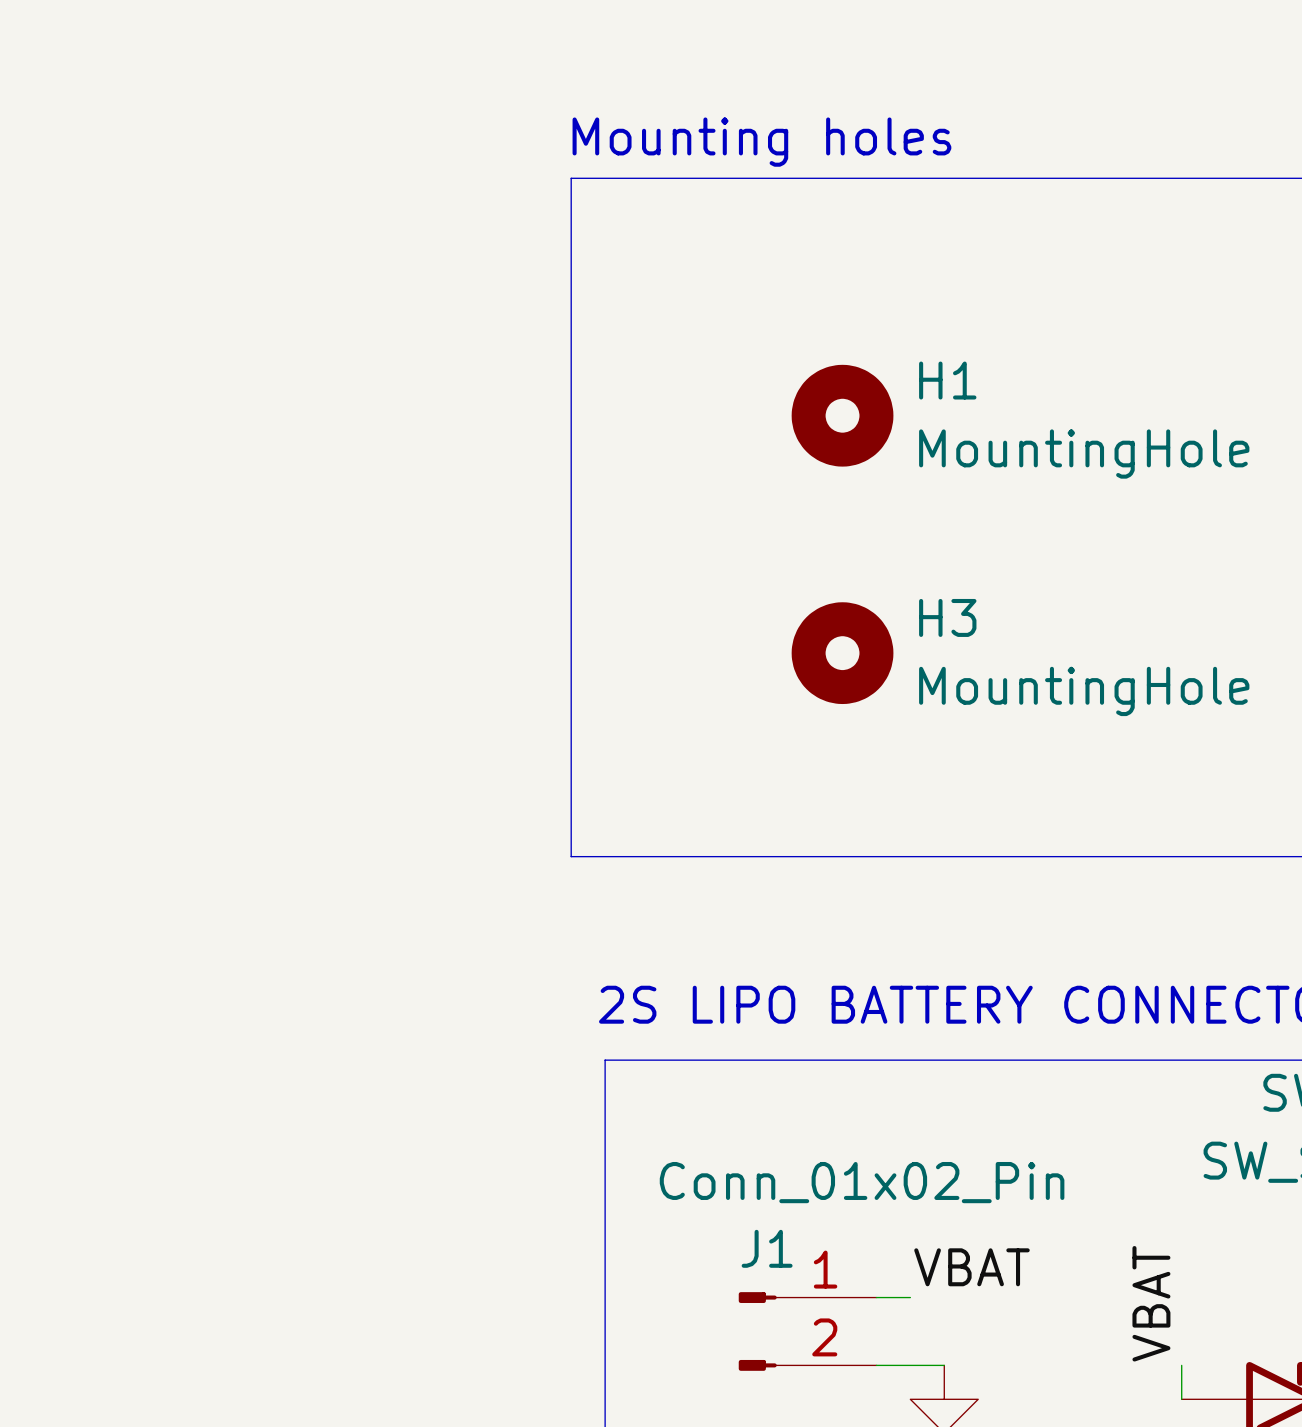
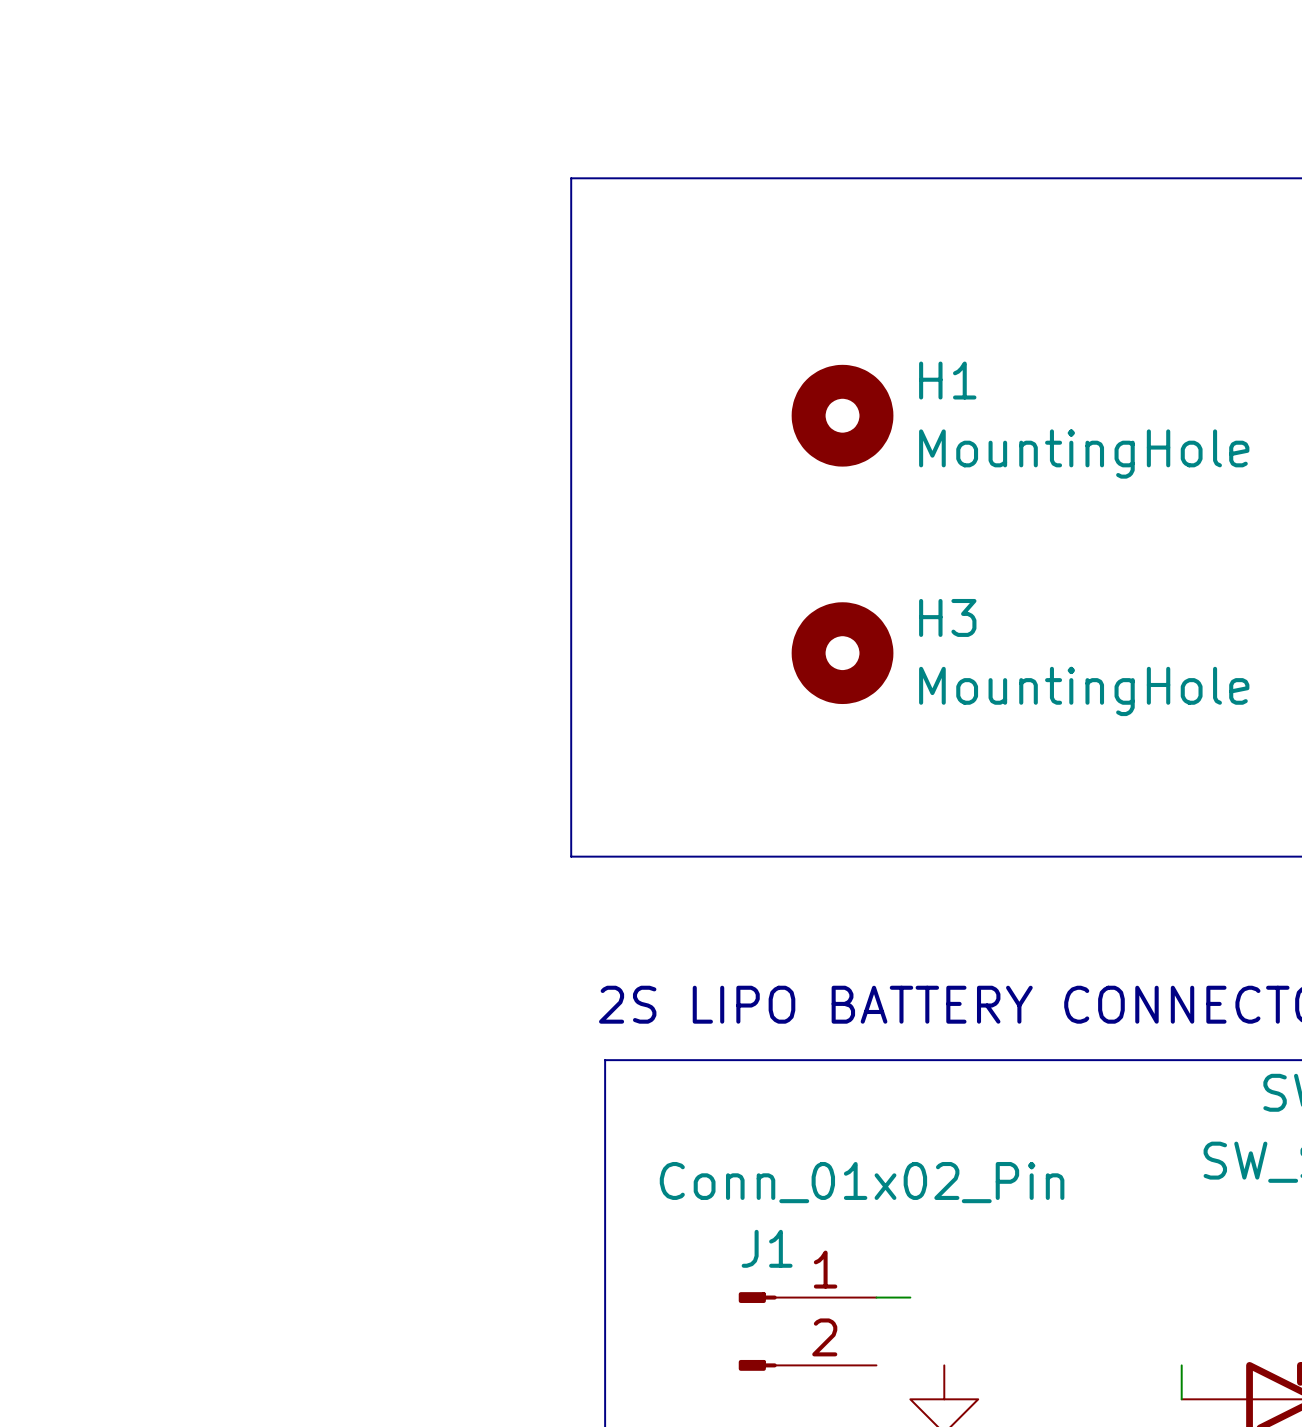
text: Mounting holes (761, 142) -> none
label: VBAT (972, 1267) -> none
label: VBAT (1151, 1303) -> none
wire: (876, 1365) (944, 1365) -> none

